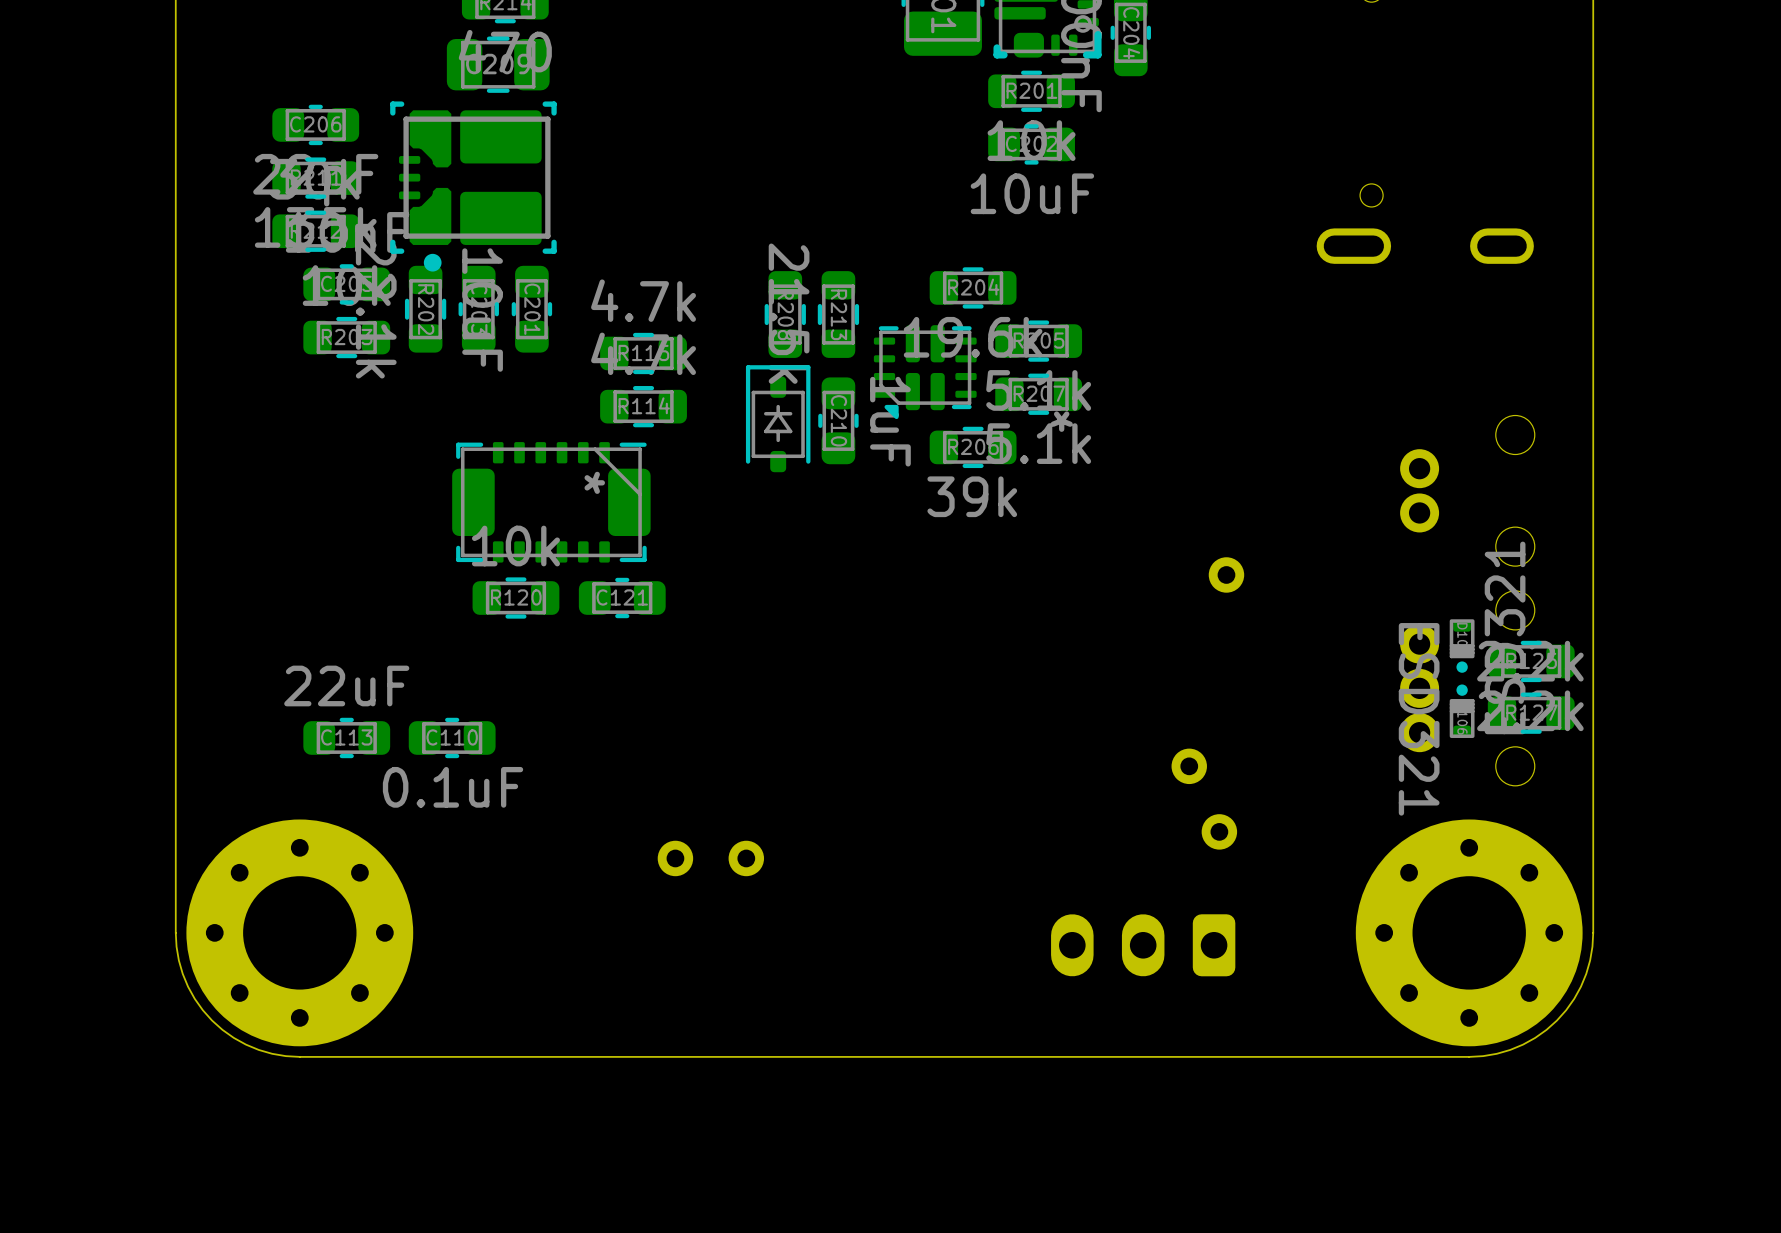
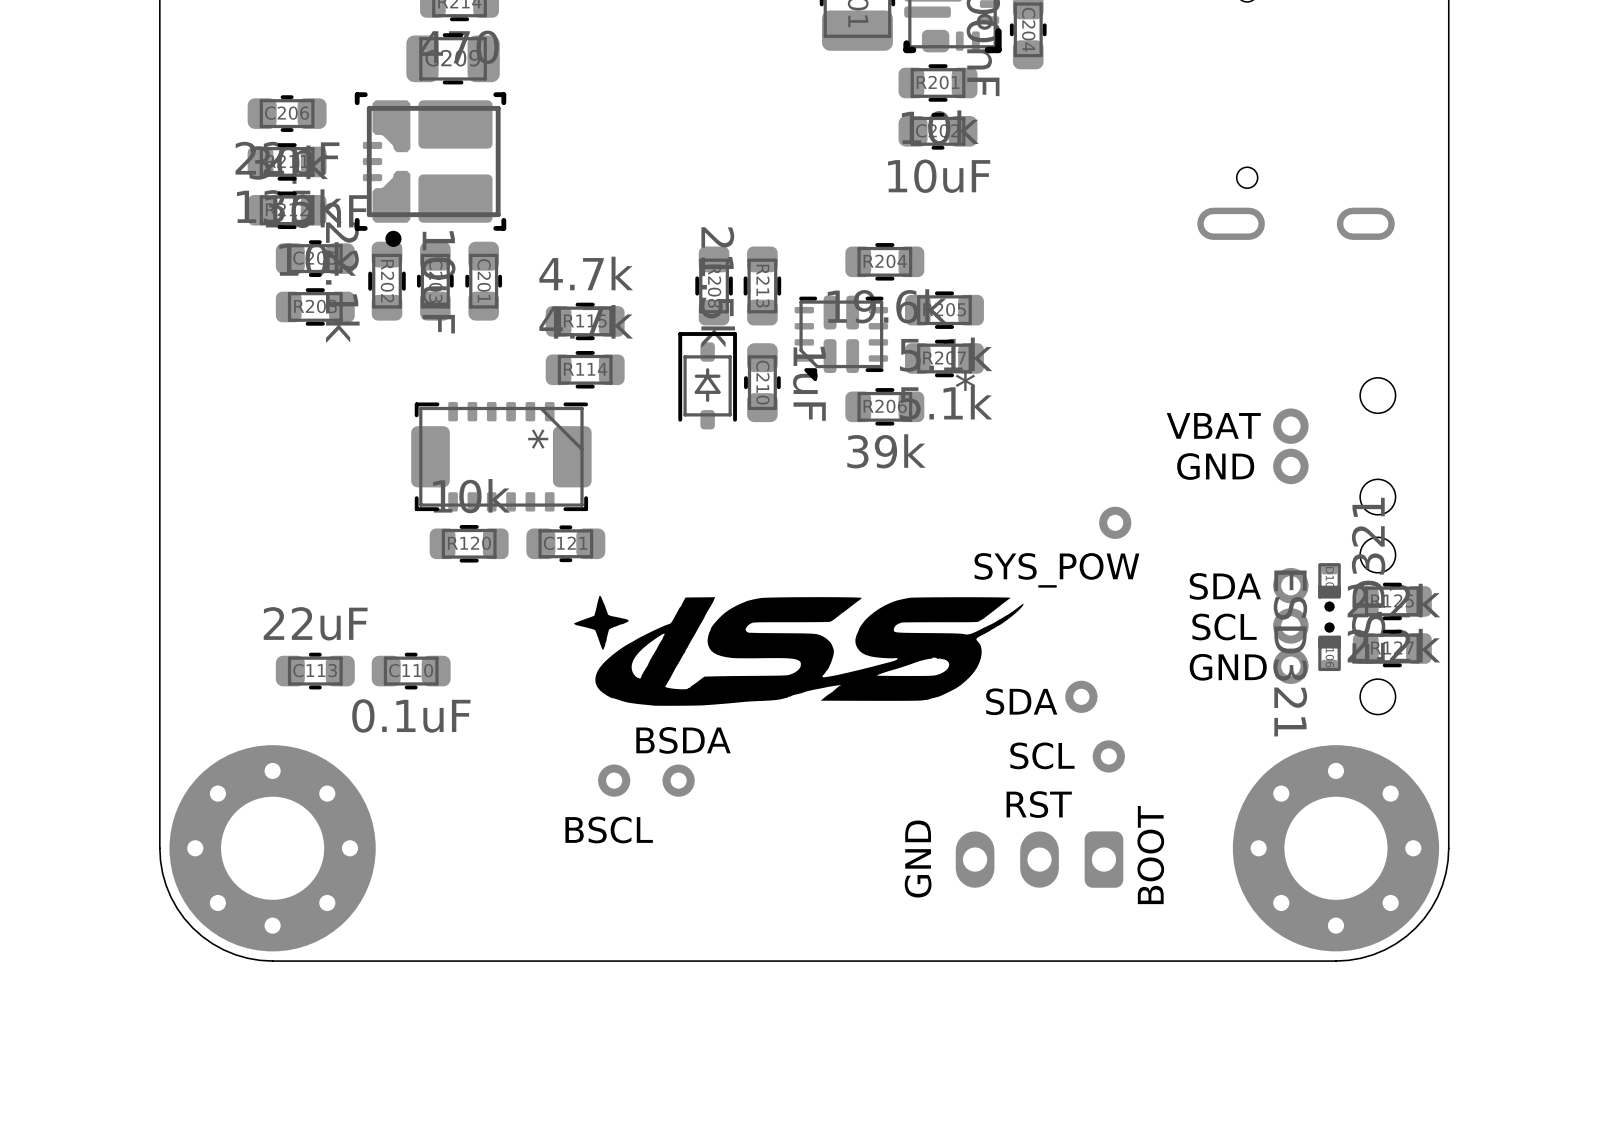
text: none -> VBAT (1213, 425)
text: none -> GND (1215, 466)
text: none -> SYS_POW (1056, 570)
text: none -> SDA (1225, 586)
drawing: none -> [574, 595, 1024, 706]
text: none -> SCL (1224, 627)
text: none -> GND (1228, 667)
text: none -> SDA (1021, 701)
text: none -> BSDA (683, 740)
text: none -> SCL (1042, 755)
text: none -> RST (1039, 804)
text: none -> BSCL (609, 830)
text: none -> BOOT (1150, 855)
text: none -> GND (918, 859)

